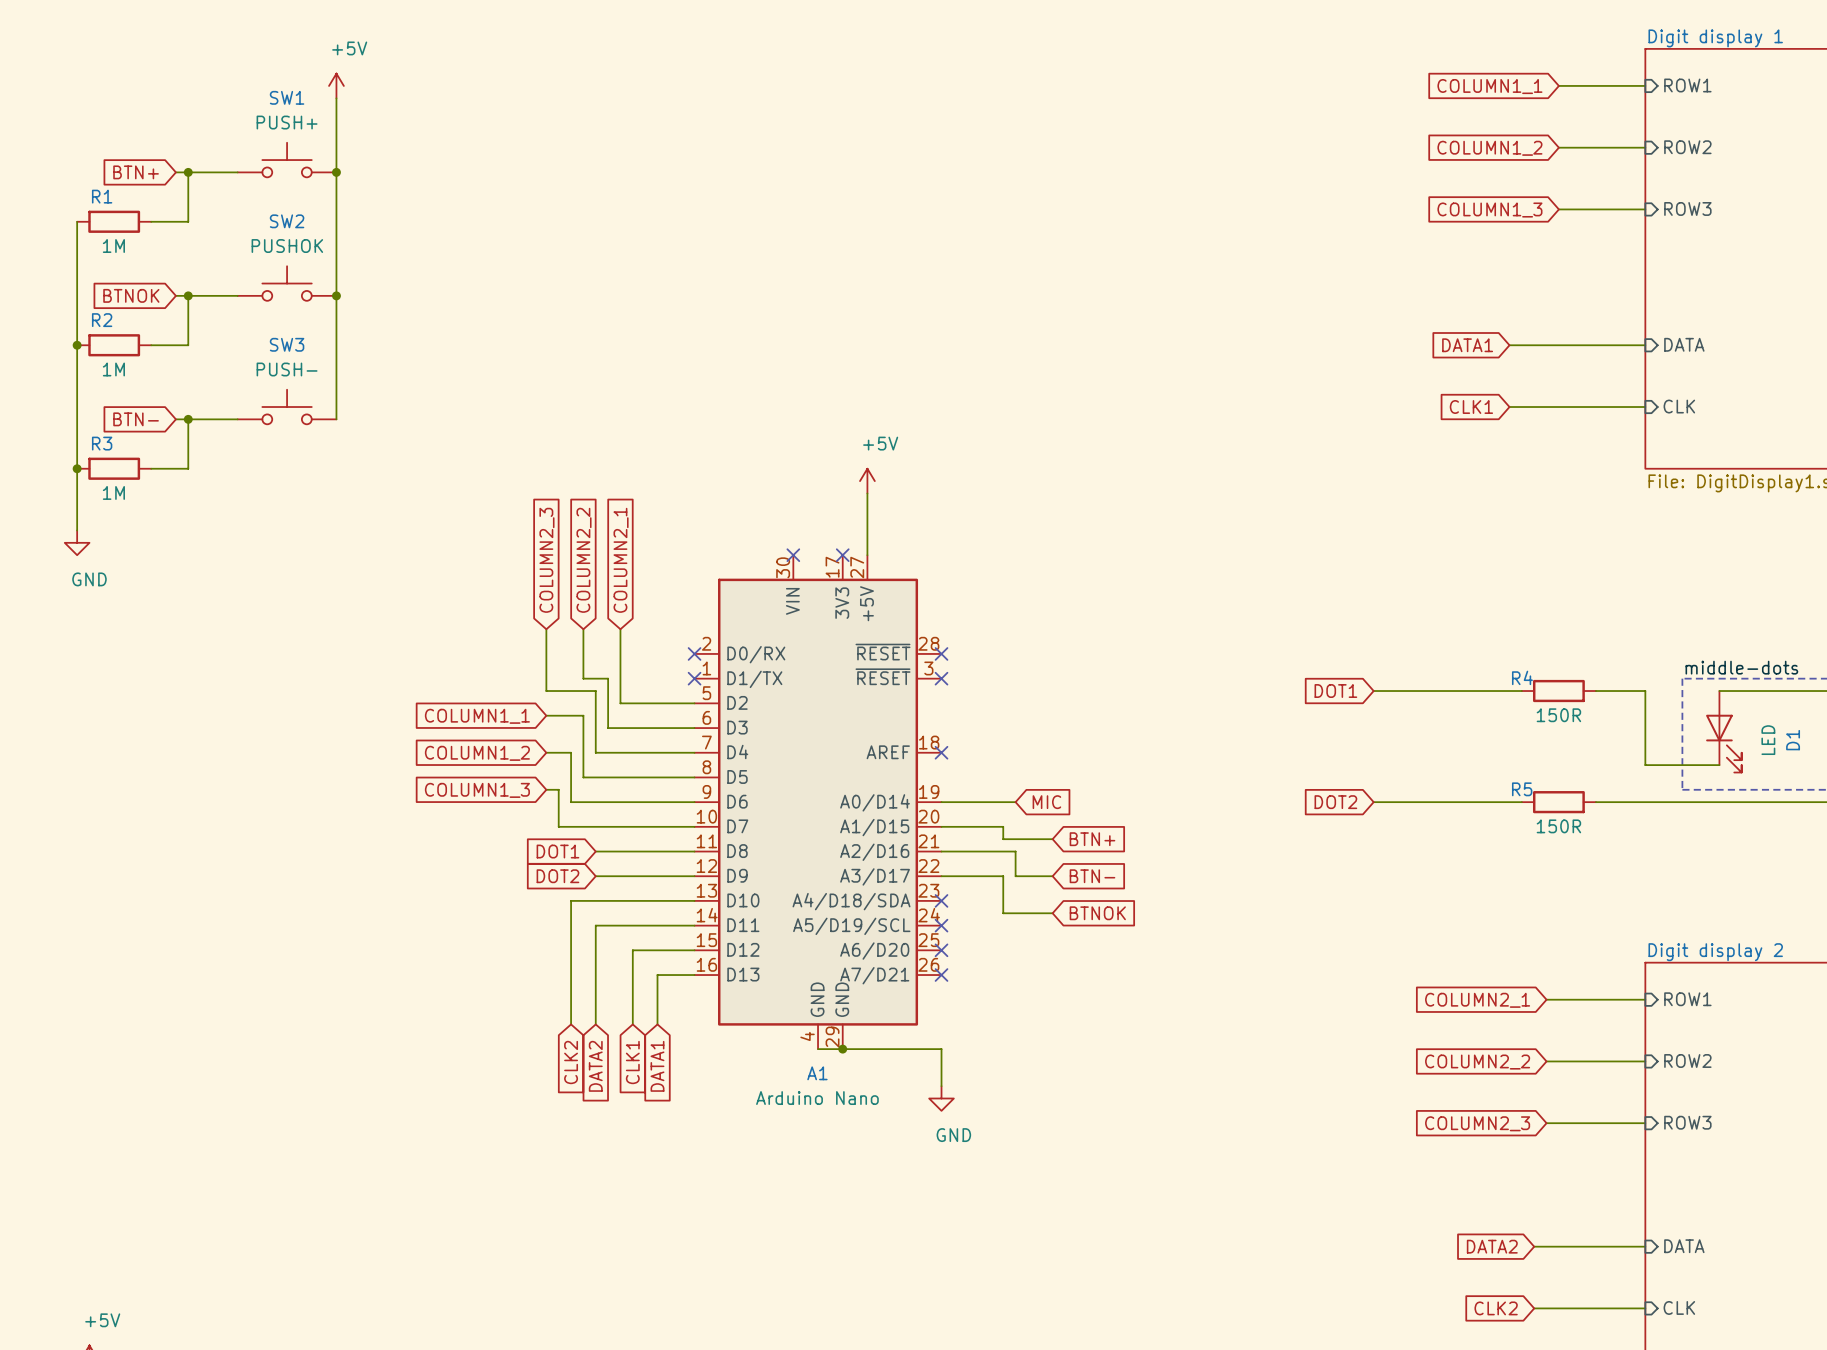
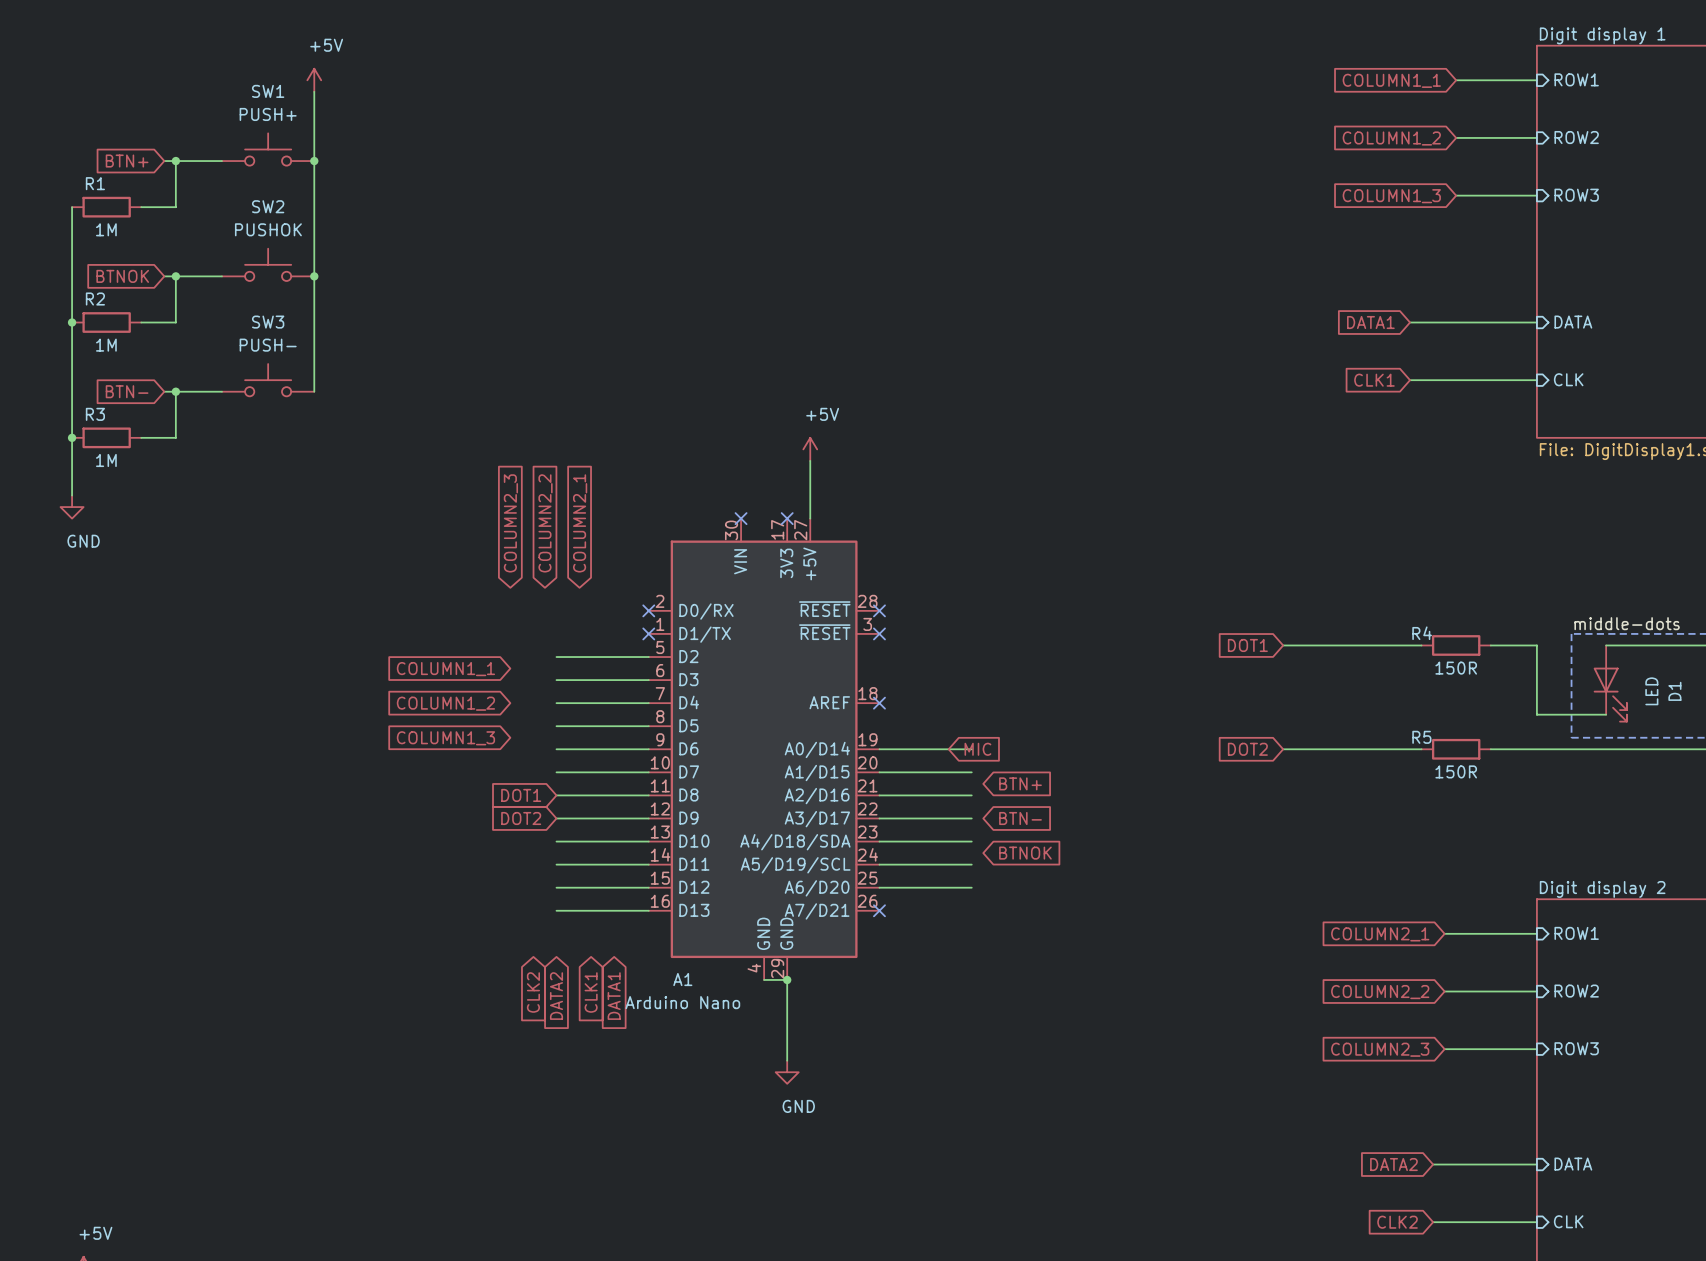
wire: (546, 629) (546, 691) (595, 691) (595, 752) -> none
wire: (583, 629) (583, 678) (608, 678) (608, 728) -> (556, 680) (568, 680)
wire: (620, 629) (620, 703) -> (556, 657) (579, 657)
wire: (546, 715) (583, 715) (583, 777) (595, 777) -> none
wire: (546, 752) (571, 752) (571, 802) (595, 802) -> none
wire: (546, 789) (558, 789) (558, 826) (595, 826) -> none
wire: none -> (948, 749) (971, 749)
wire: (1003, 826) (1003, 839) (1052, 839) -> (937, 772) (971, 772)
wire: (1015, 851) (1015, 876) -> (937, 818) (948, 818)
wire: none -> (948, 795) (971, 795)
wire: (1003, 876) (1003, 913) (1052, 913) -> none
wire: (1040, 876) (1052, 876) -> none
wire: (595, 900) (571, 900) (571, 1024) -> none
wire: none -> (879, 841) (971, 841)
no-connect mark: (941, 900) -> none
wire: (595, 925) (595, 1024) -> none
wire: none -> (879, 864) (971, 864)
no-connect mark: (941, 925) -> none
wire: (632, 950) (632, 1024) -> (591, 887) (556, 887)
wire: none -> (879, 887) (971, 887)
no-connect mark: (941, 950) -> none
wire: (657, 975) (657, 1024) -> (614, 910) (556, 910)
wire: (842, 1049) (941, 1049) (941, 1086) -> (787, 979) (787, 1060)
A1 name position: A1 (817, 1073) -> A1 (682, 979)
A1 value position: Arduino Nano (817, 1098) -> Arduino Nano (682, 1002)
power symbol position: GND (941, 1098) -> GND (787, 1072)

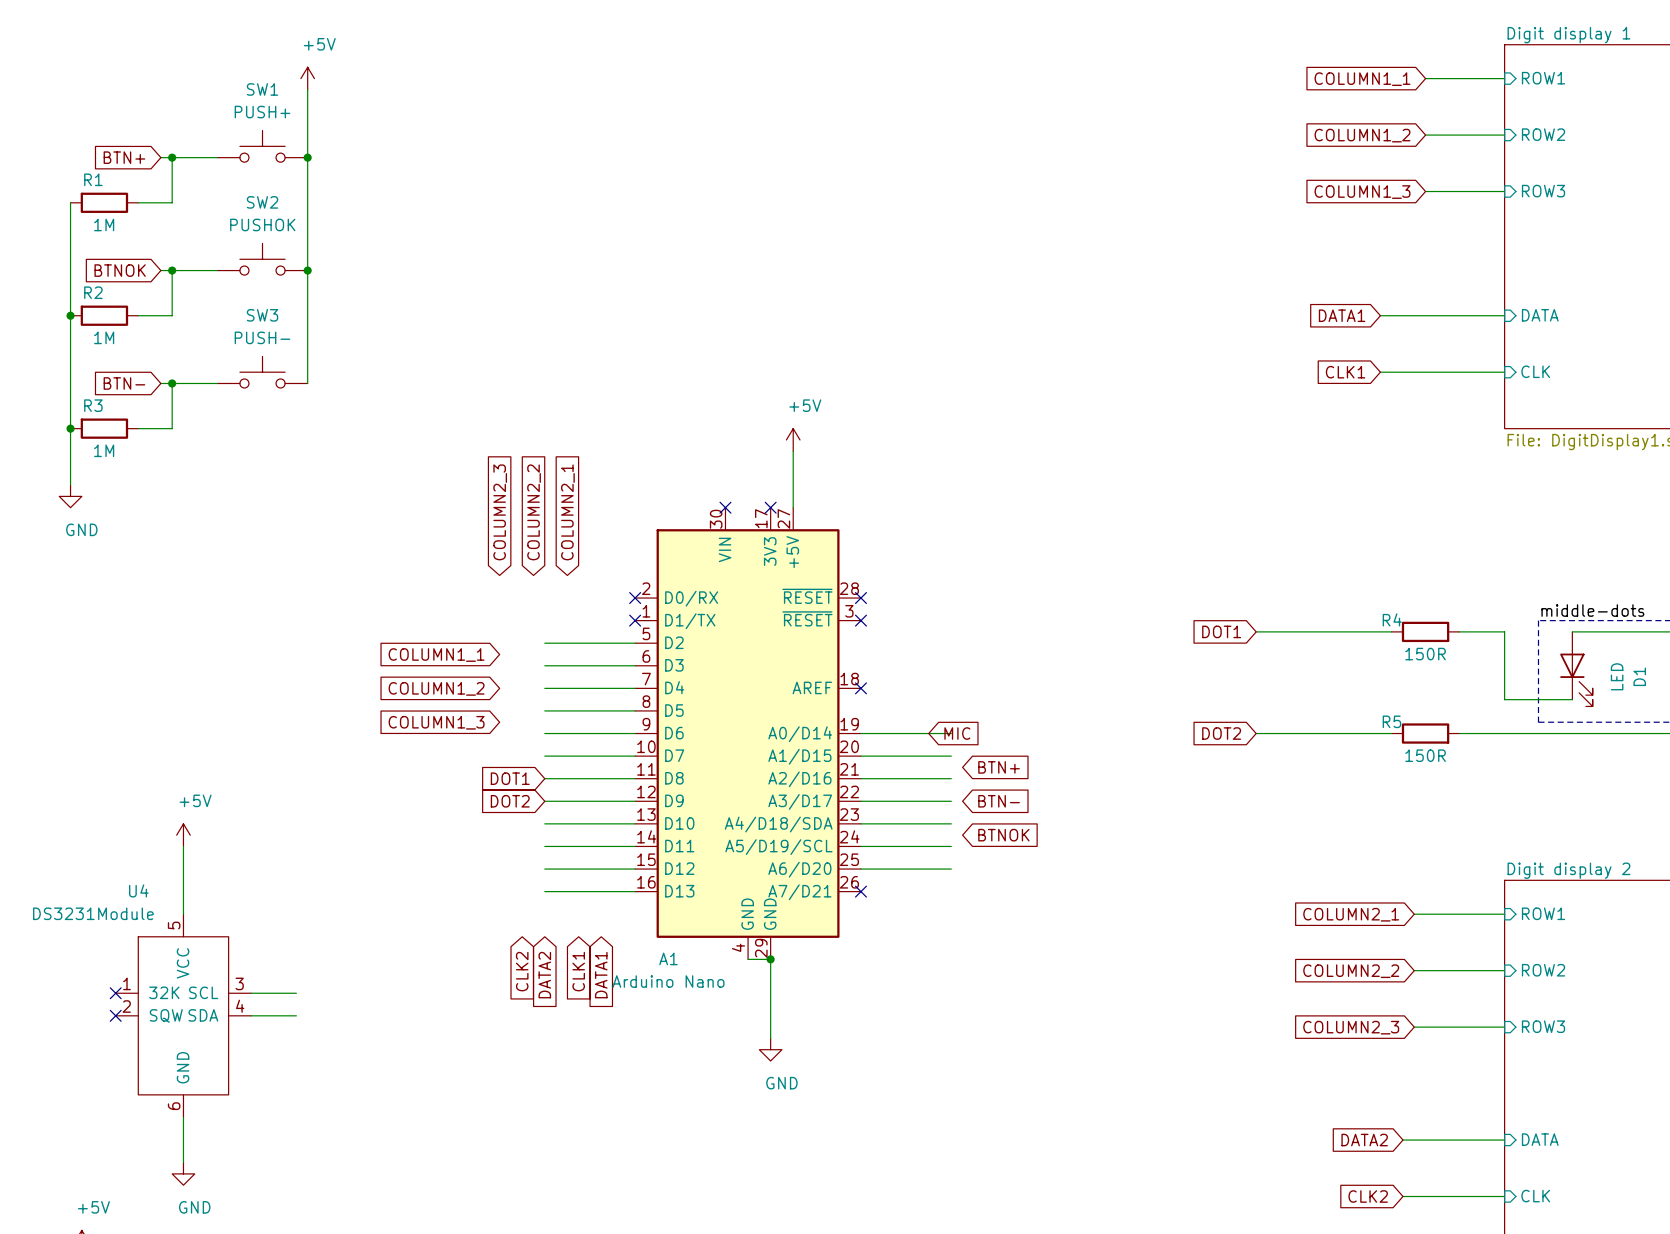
power symbol: none -> +5V (183, 835)
wire: none -> (183, 846) (183, 914)
no-connect mark: none -> (115, 993)
wire: none -> (251, 993) (296, 993)
no-connect mark: none -> (115, 1015)
U4: none -> DS3231Module (183, 1015)
wire: none -> (251, 1015) (296, 1015)
wire: none -> (183, 1117) (183, 1162)
power symbol: none -> GND (183, 1173)

